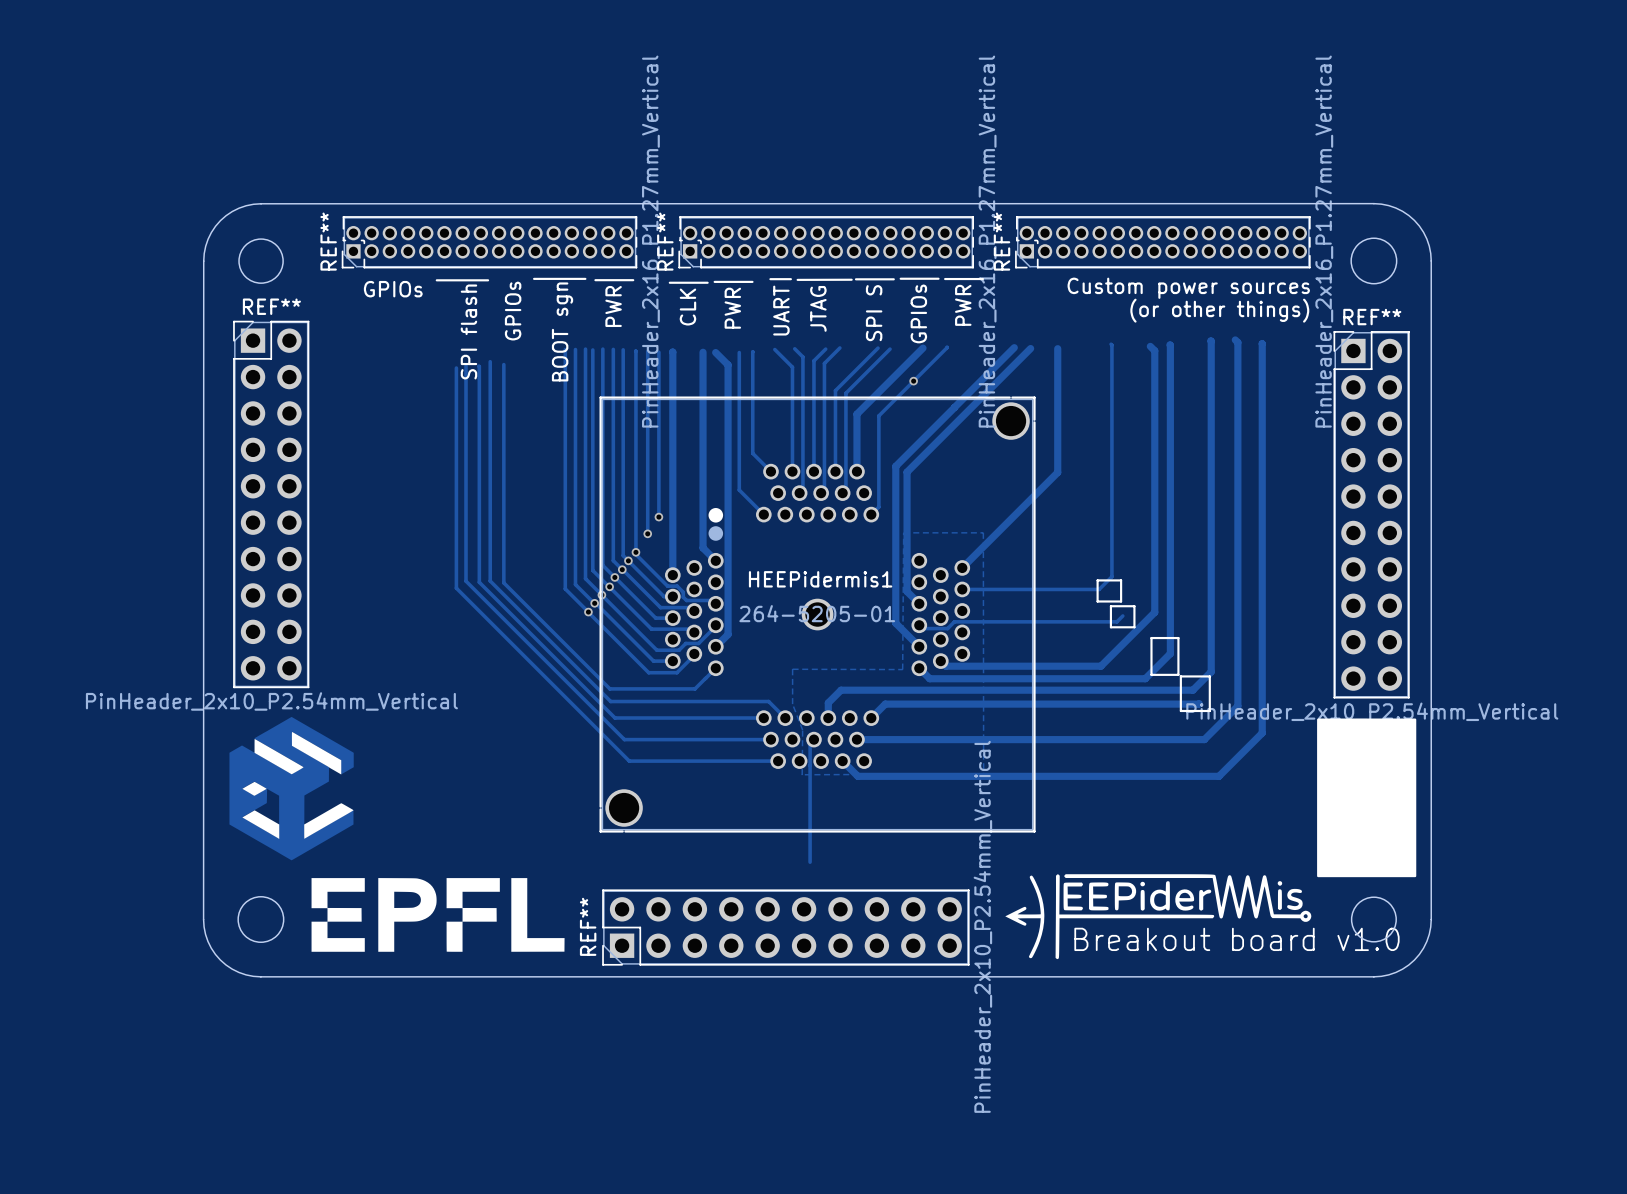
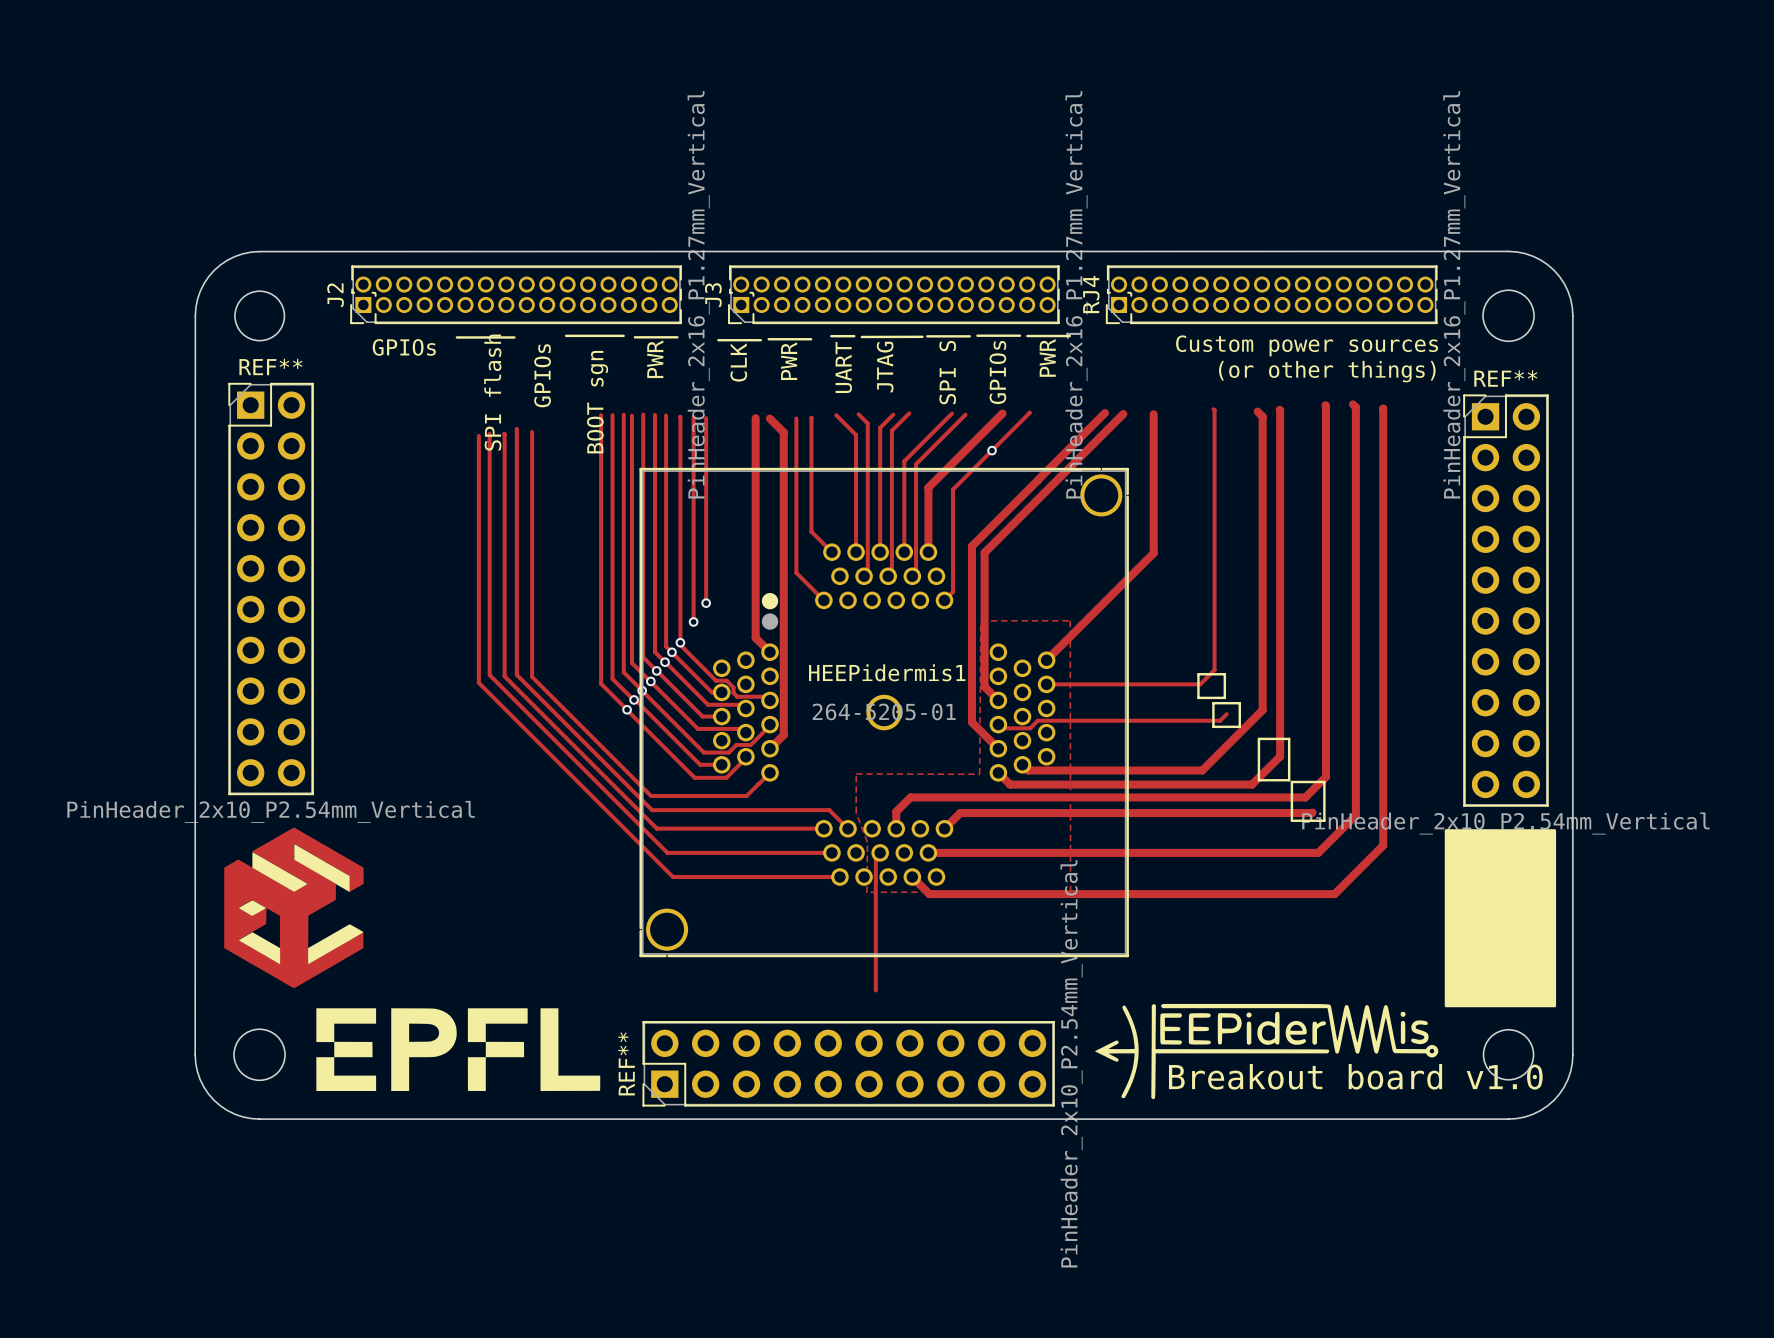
REF** name: REF** (328, 241) -> J2 (335, 295)
REF** name: REF** (665, 241) -> J3 (713, 295)
REF** name: REF** (1002, 241) -> RJ4 (1091, 294)
track: (672, 352) (672, 575) -> none

